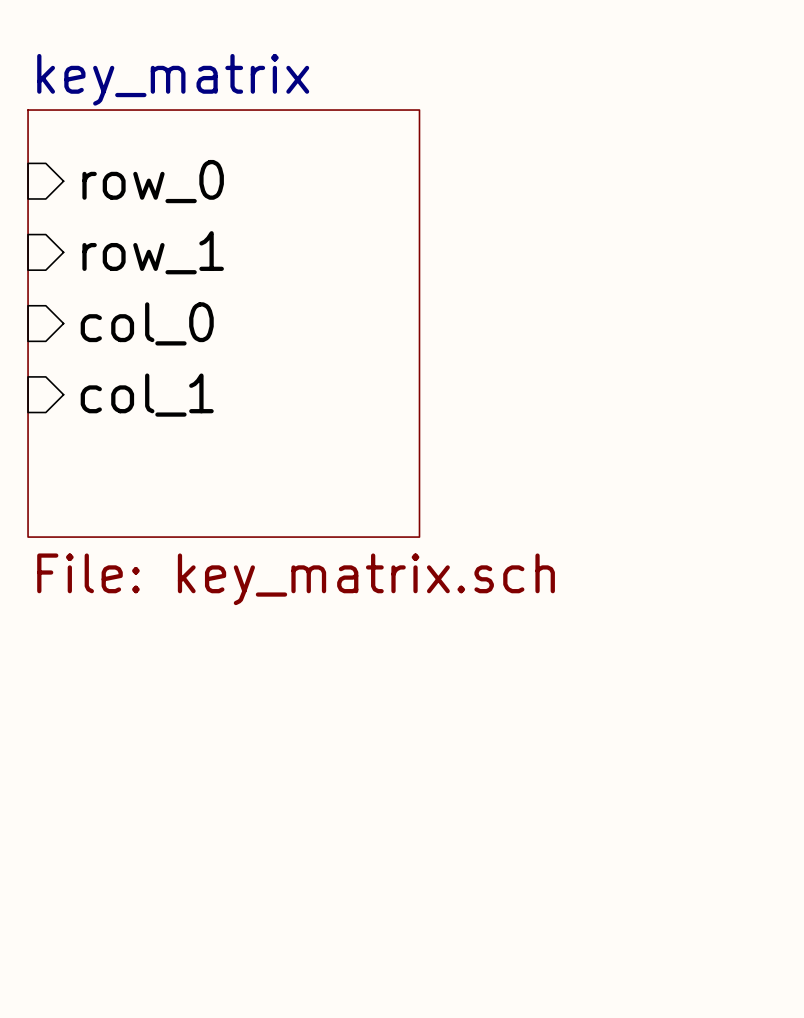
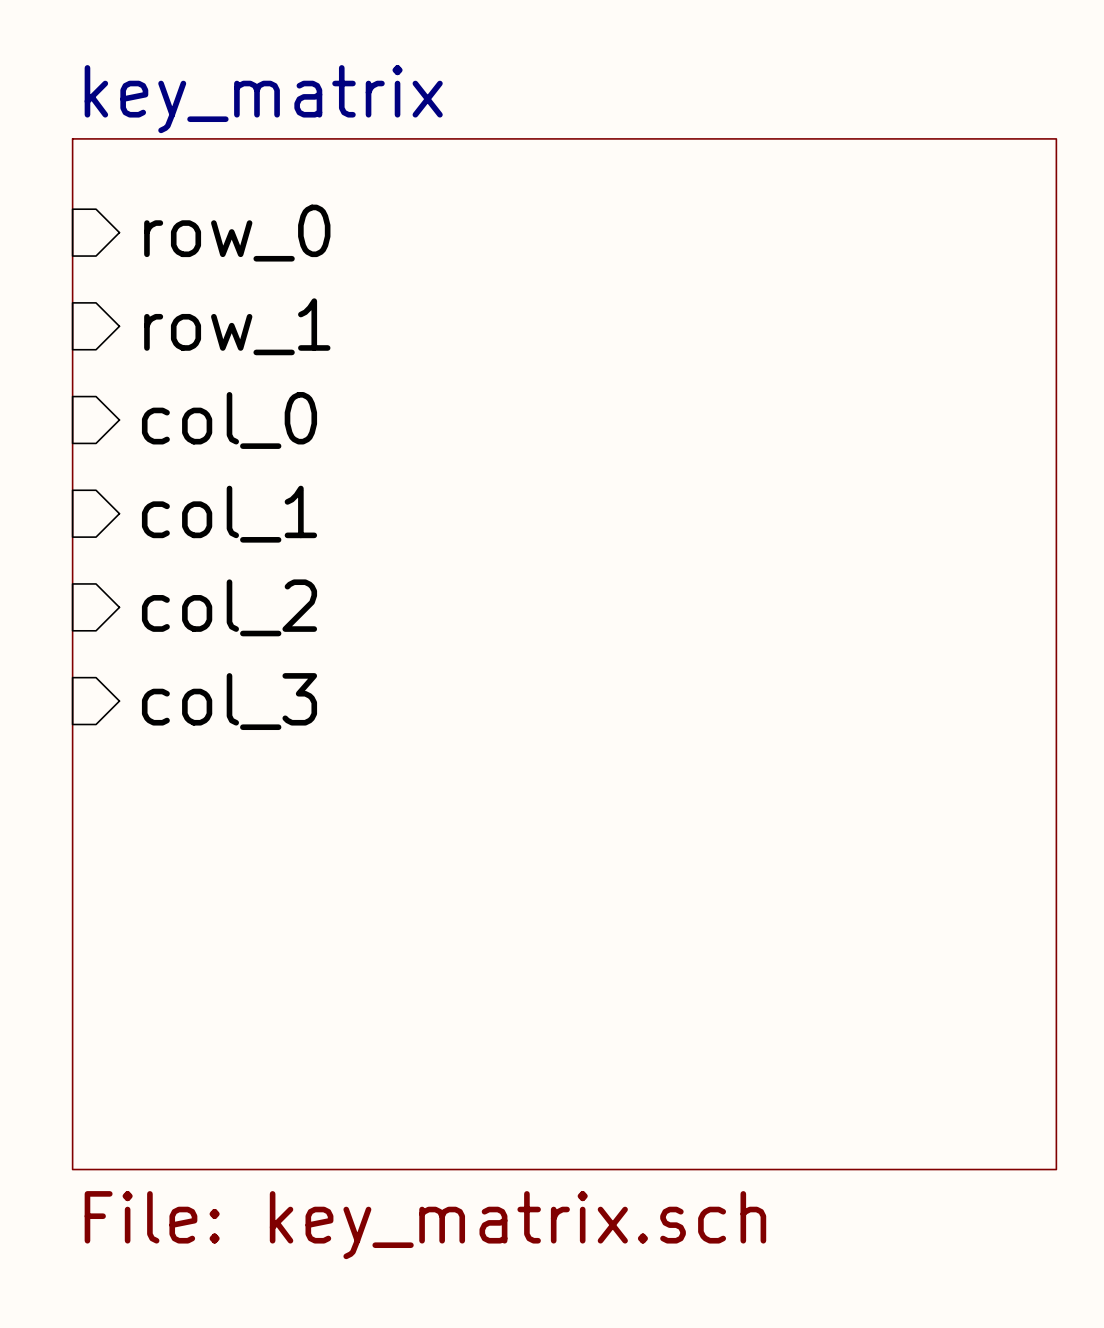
sheet key_matrix: File: key_matrix.sch (223, 323) -> none
sheet pin: none -> col_2 (229, 607)
sheet key_matrix: none -> File: key_matrix.sch (564, 654)
sheet pin: none -> col_3 (229, 701)

